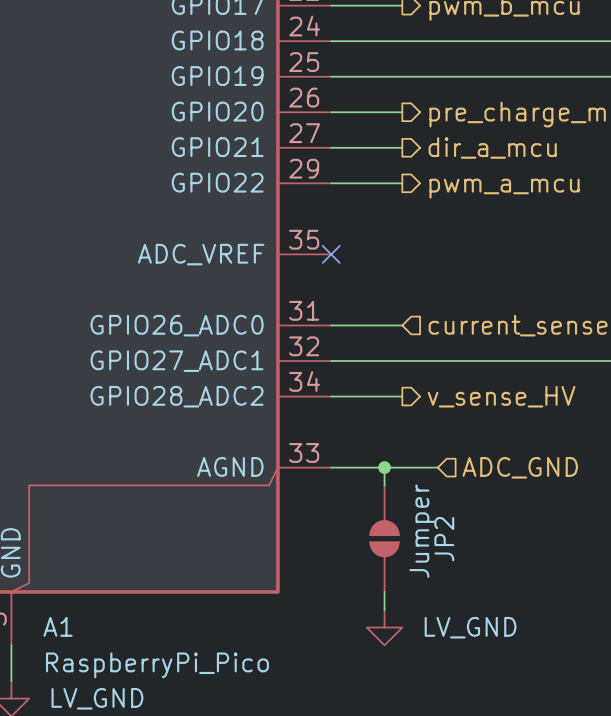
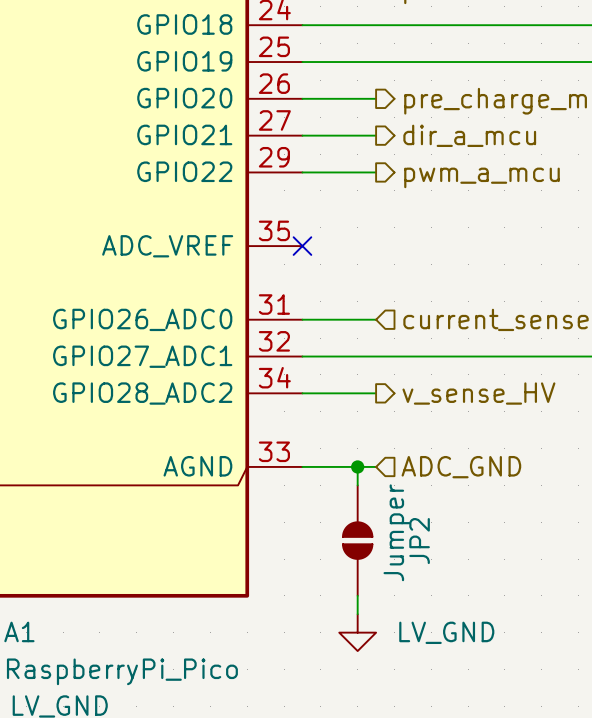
wire: (402, 467) (437, 467) -> none
hierarchical label position: ADC_GND (520, 467) -> ADC_GND (461, 467)

